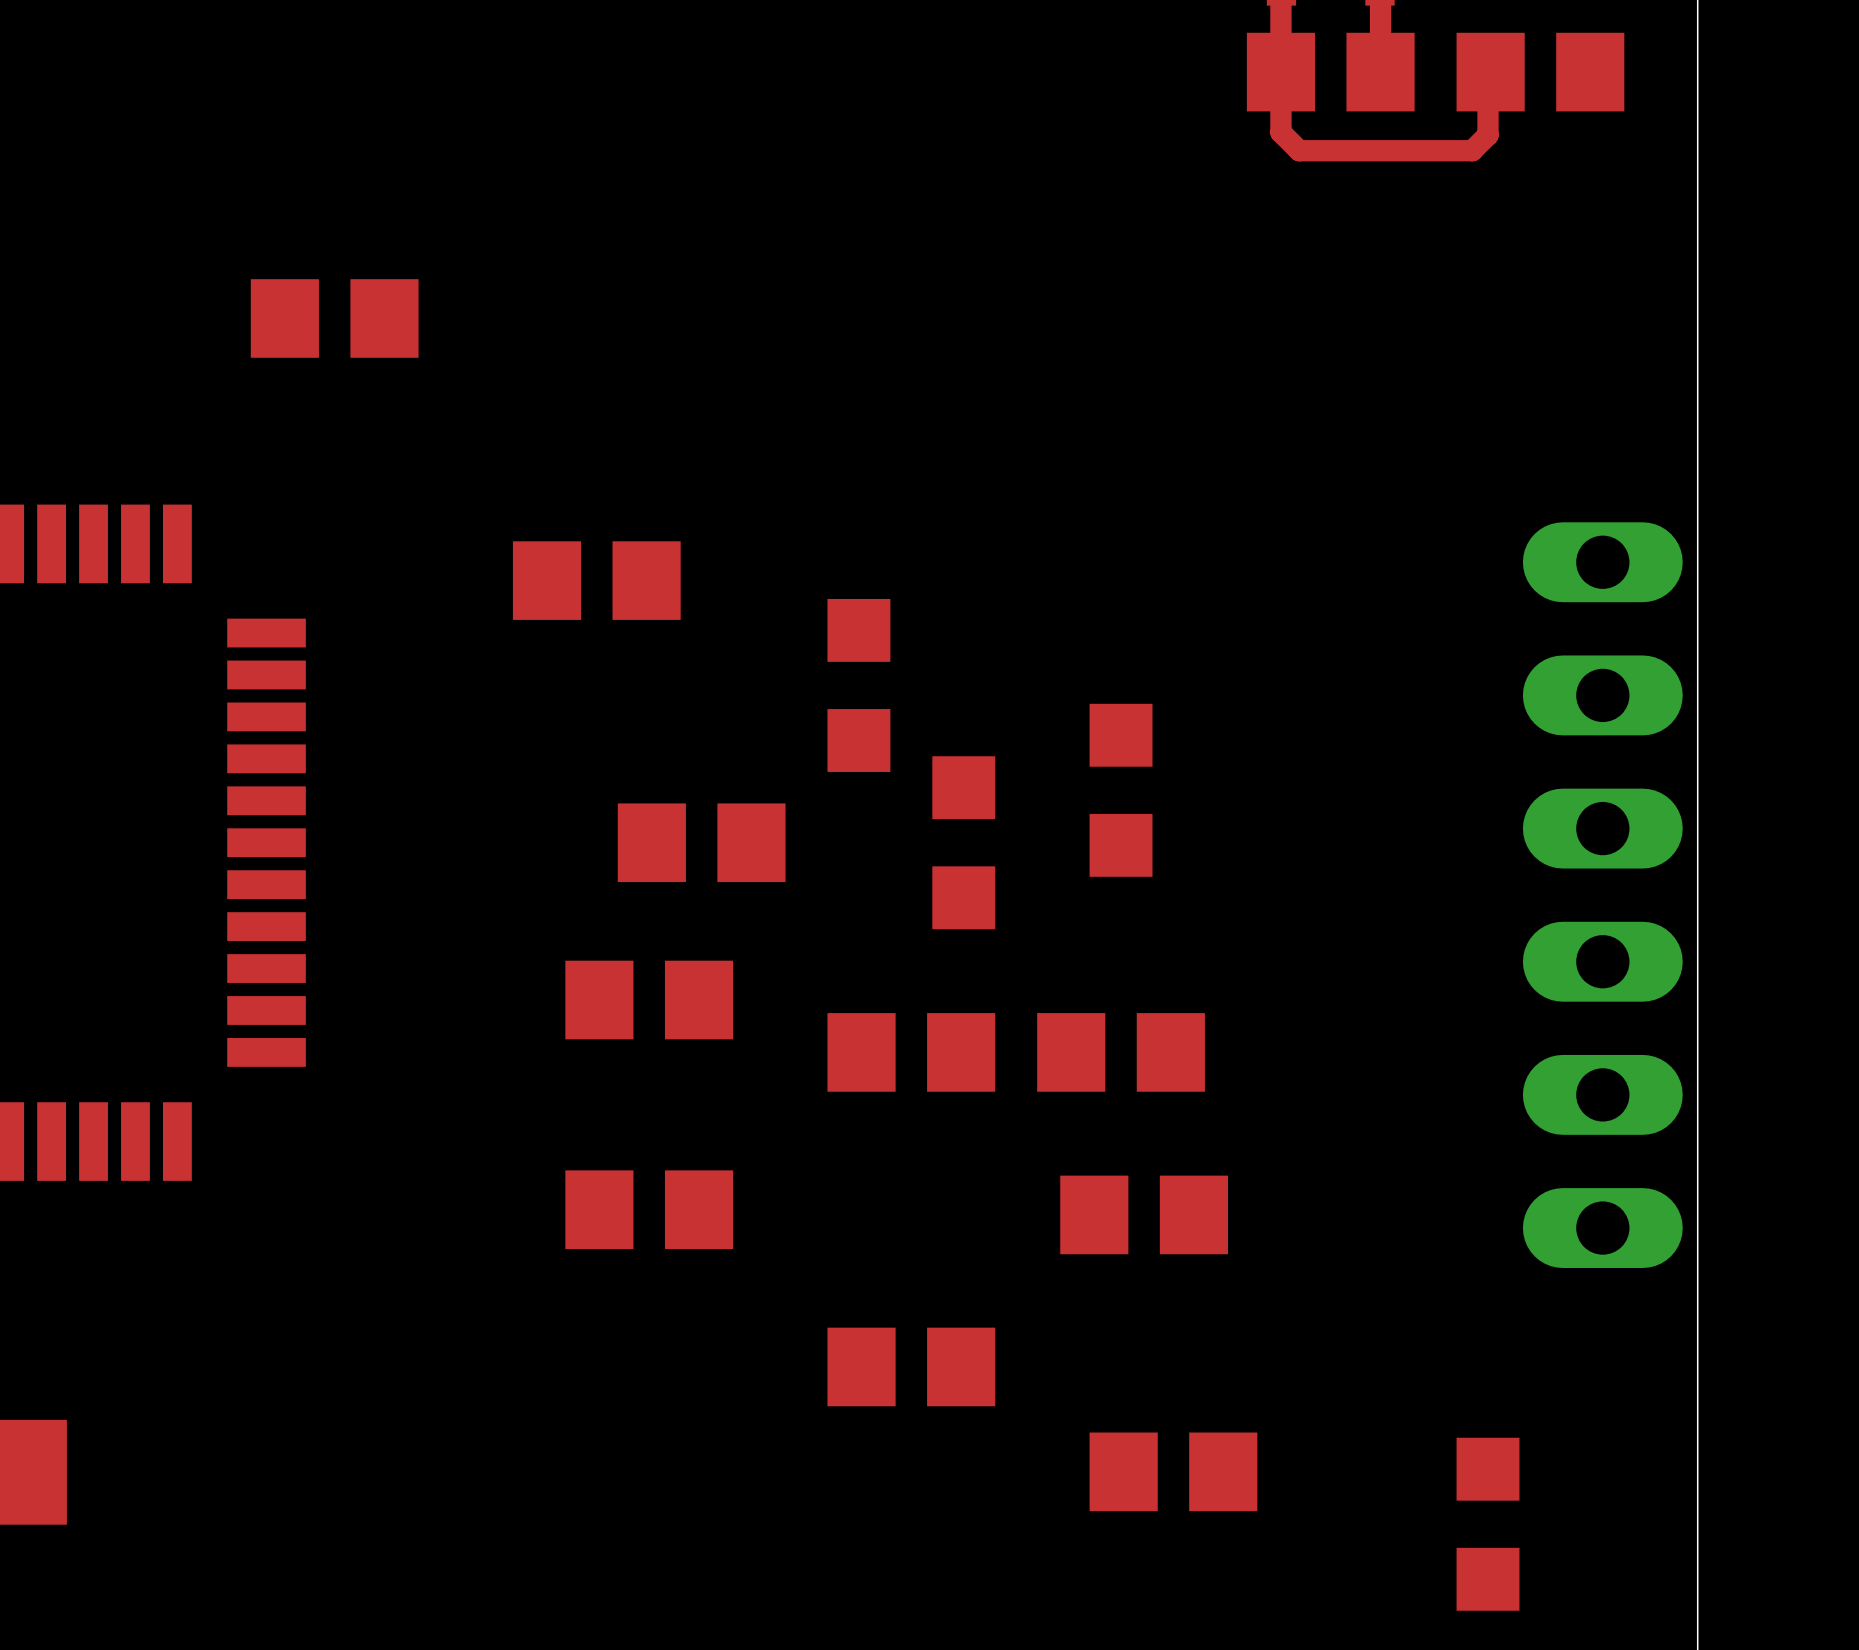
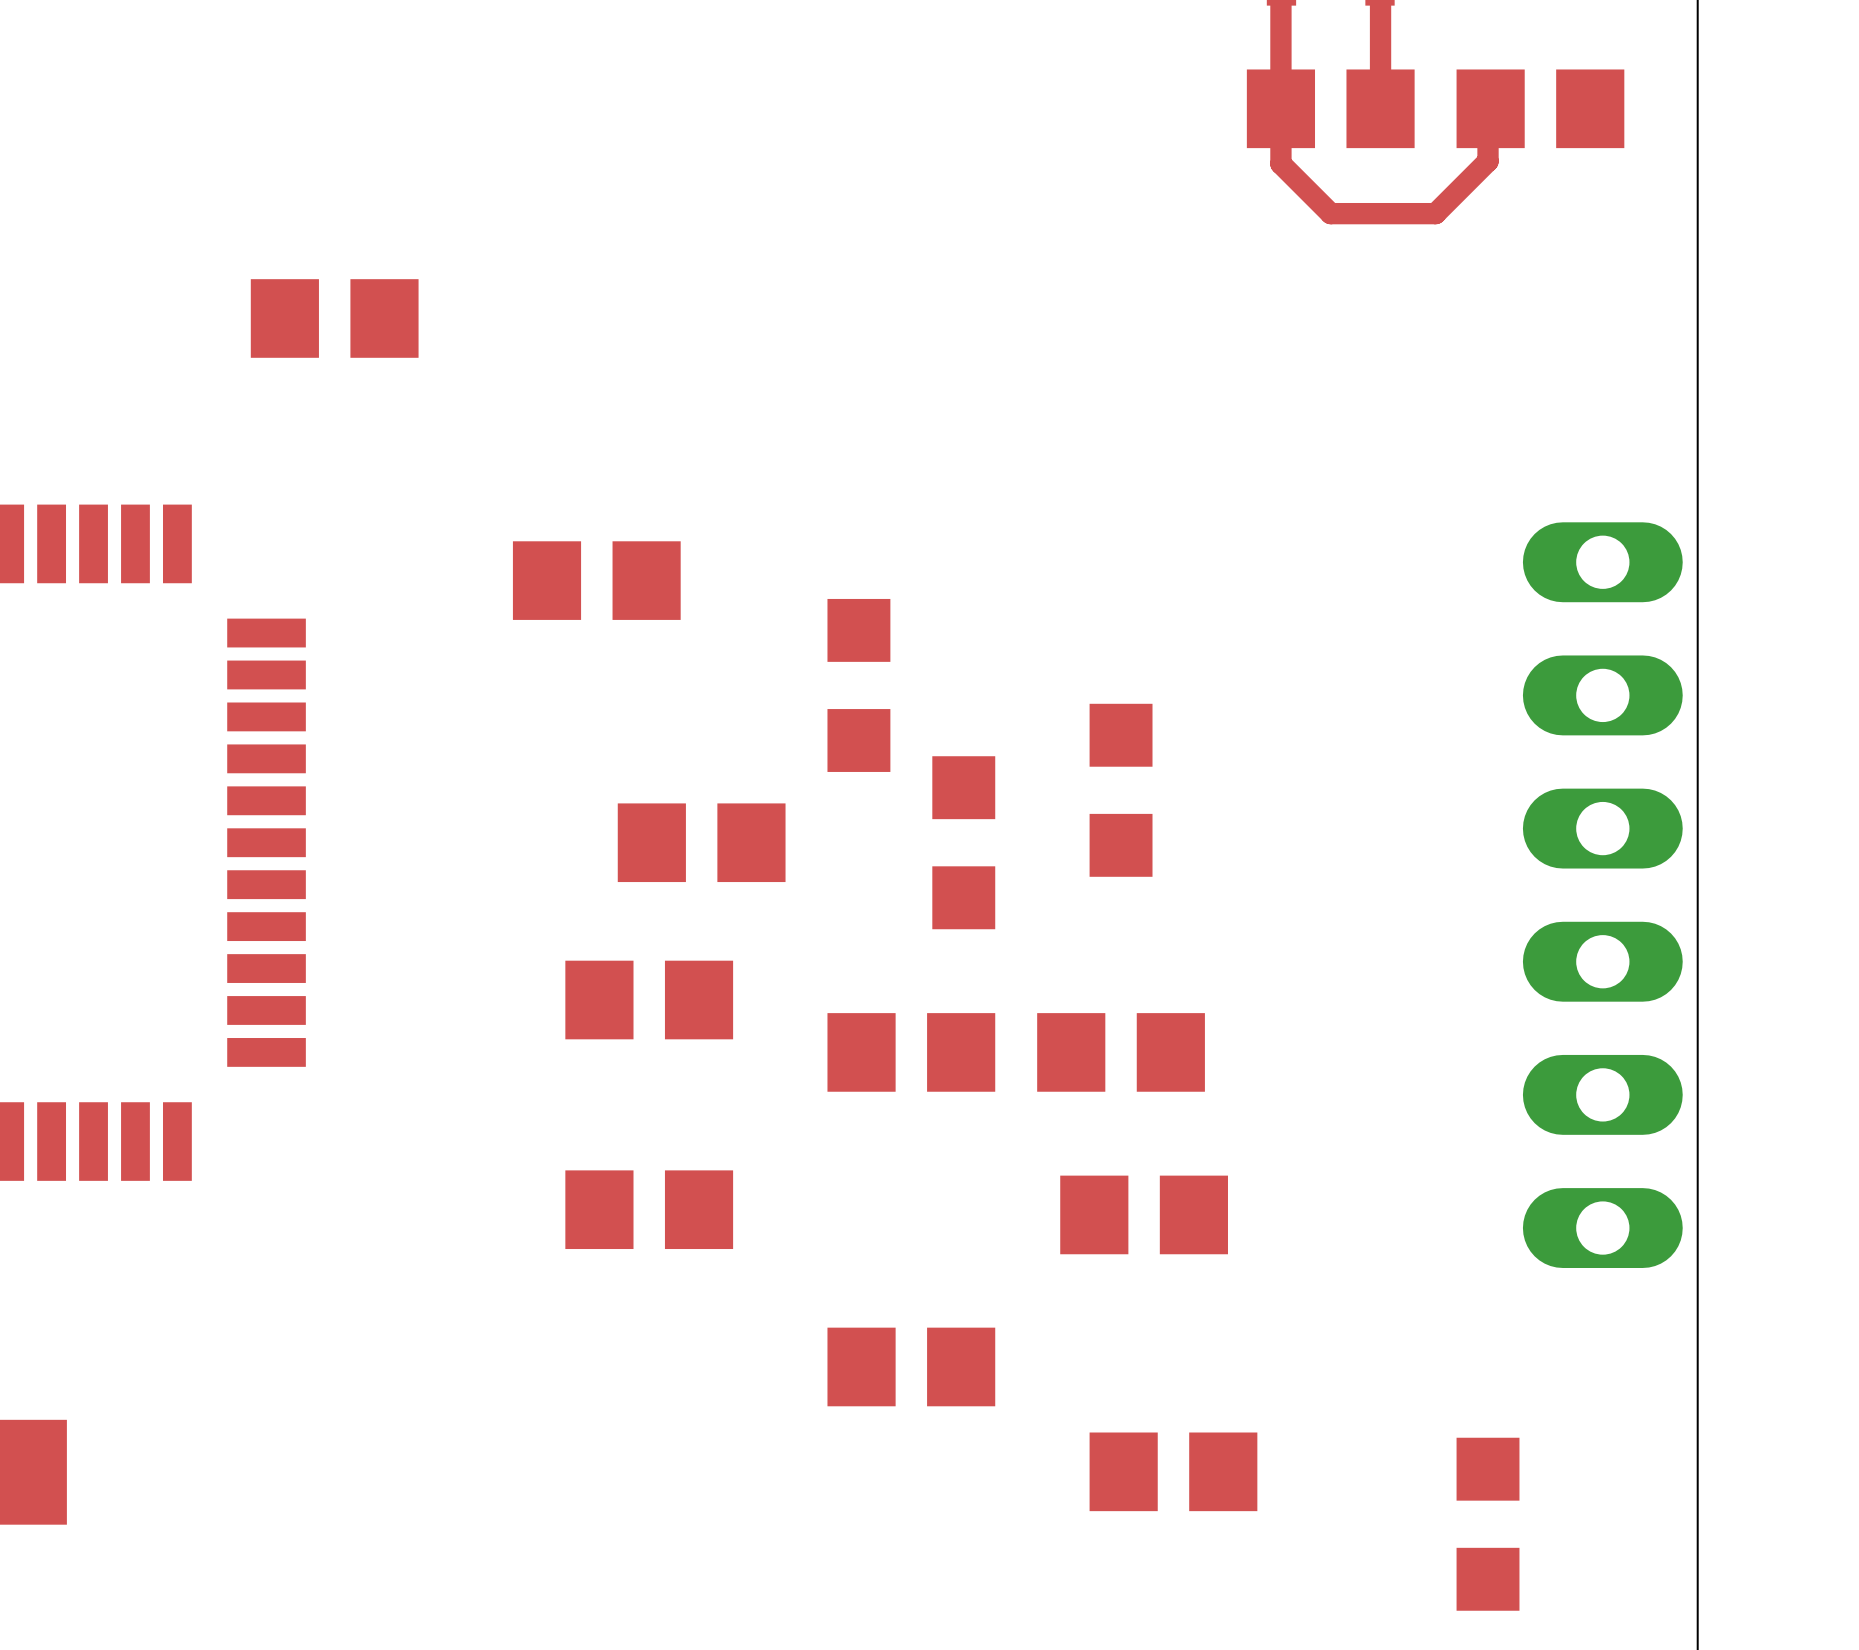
part position: (1330, 72) -> (1330, 108)
part position: (1540, 72) -> (1540, 108)
top track: (1280, 132) (1299, 150) (1472, 150) (1488, 135) -> (1280, 132) (1280, 163) (1330, 213) (1435, 213) (1488, 161) (1488, 135)

